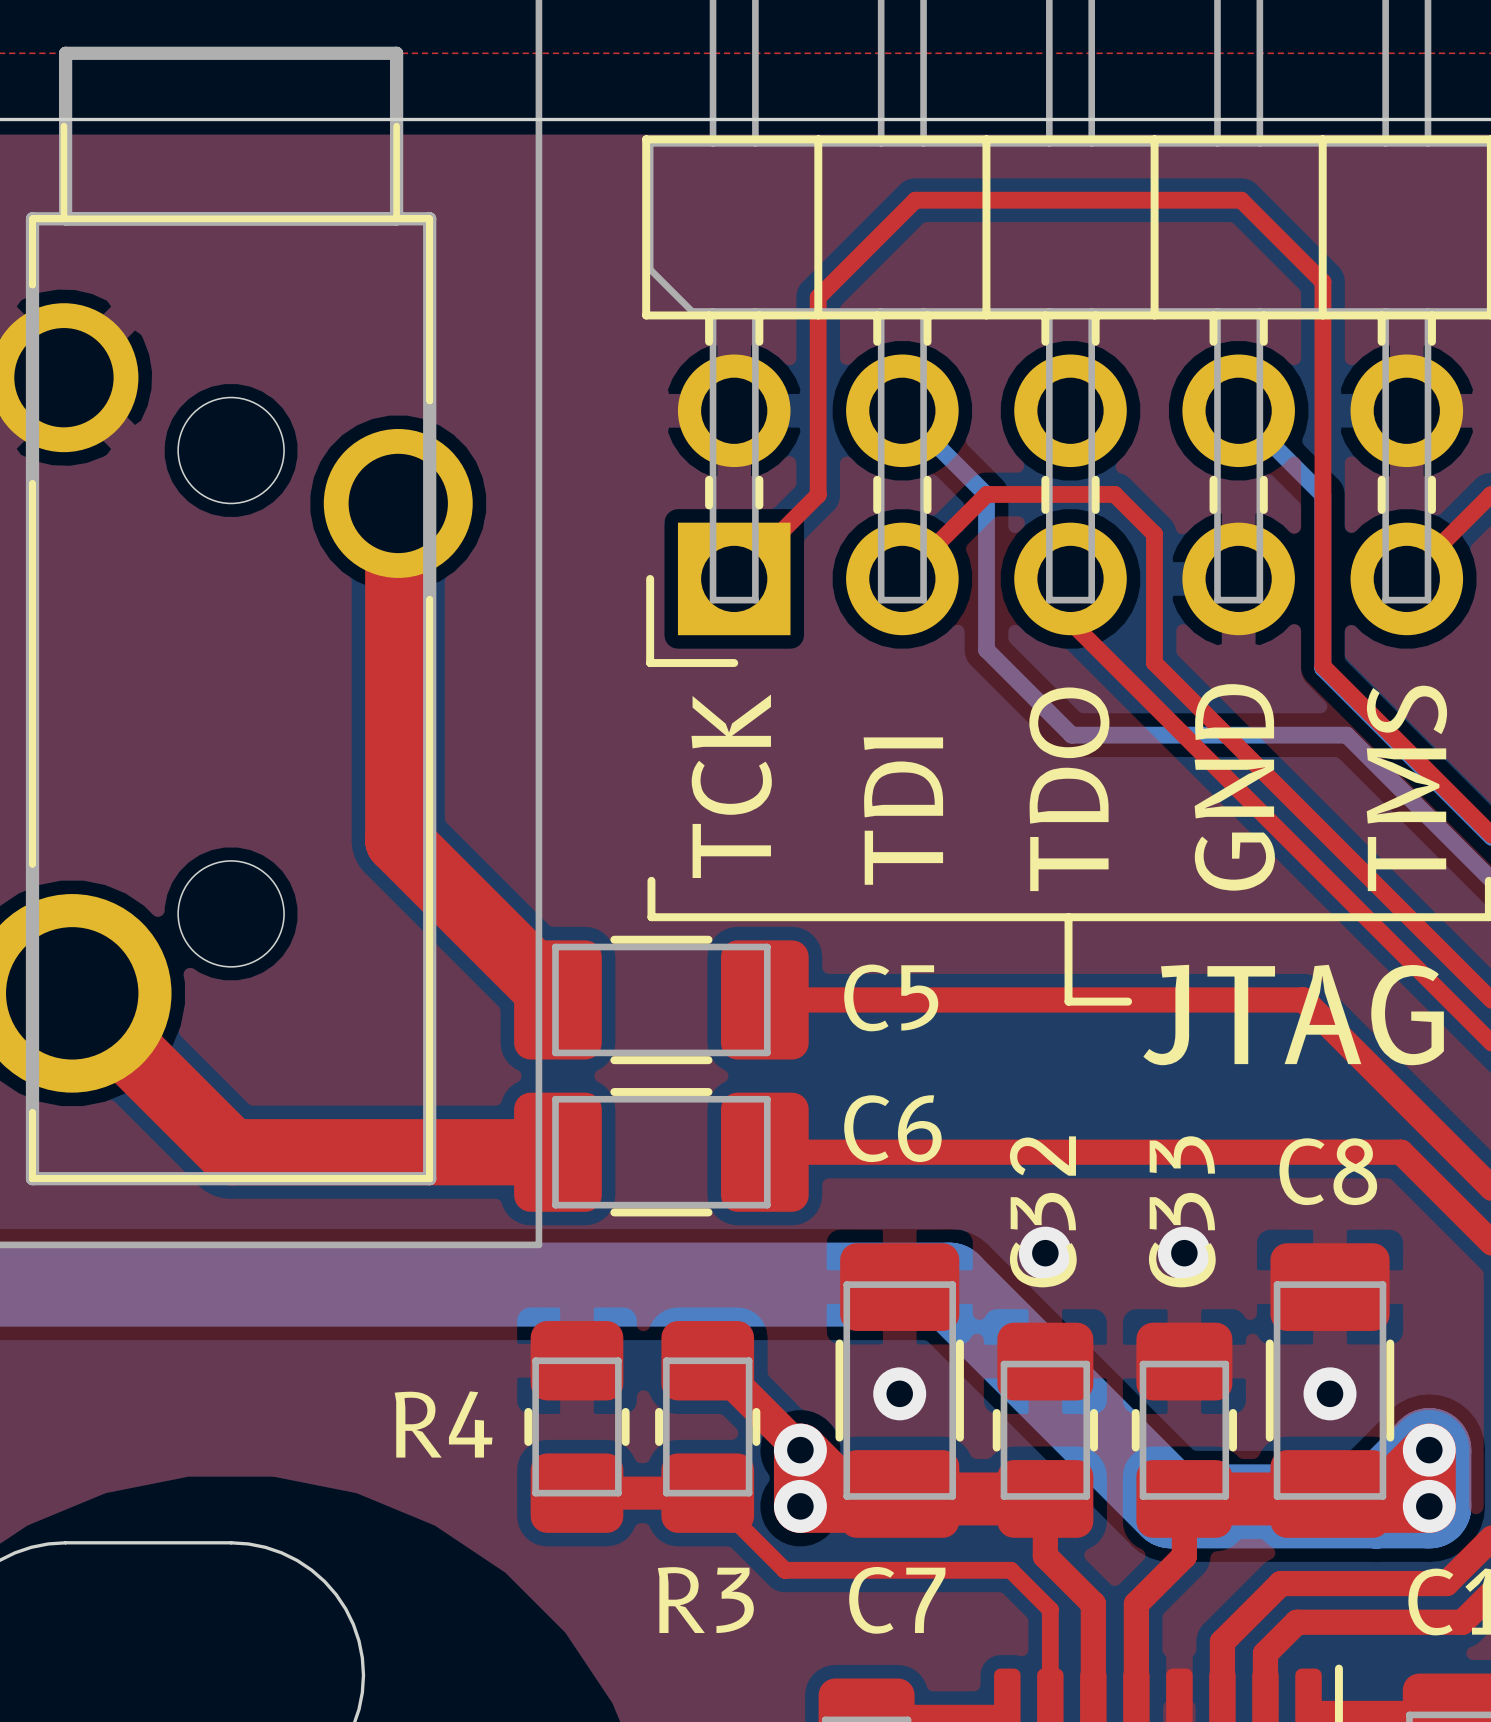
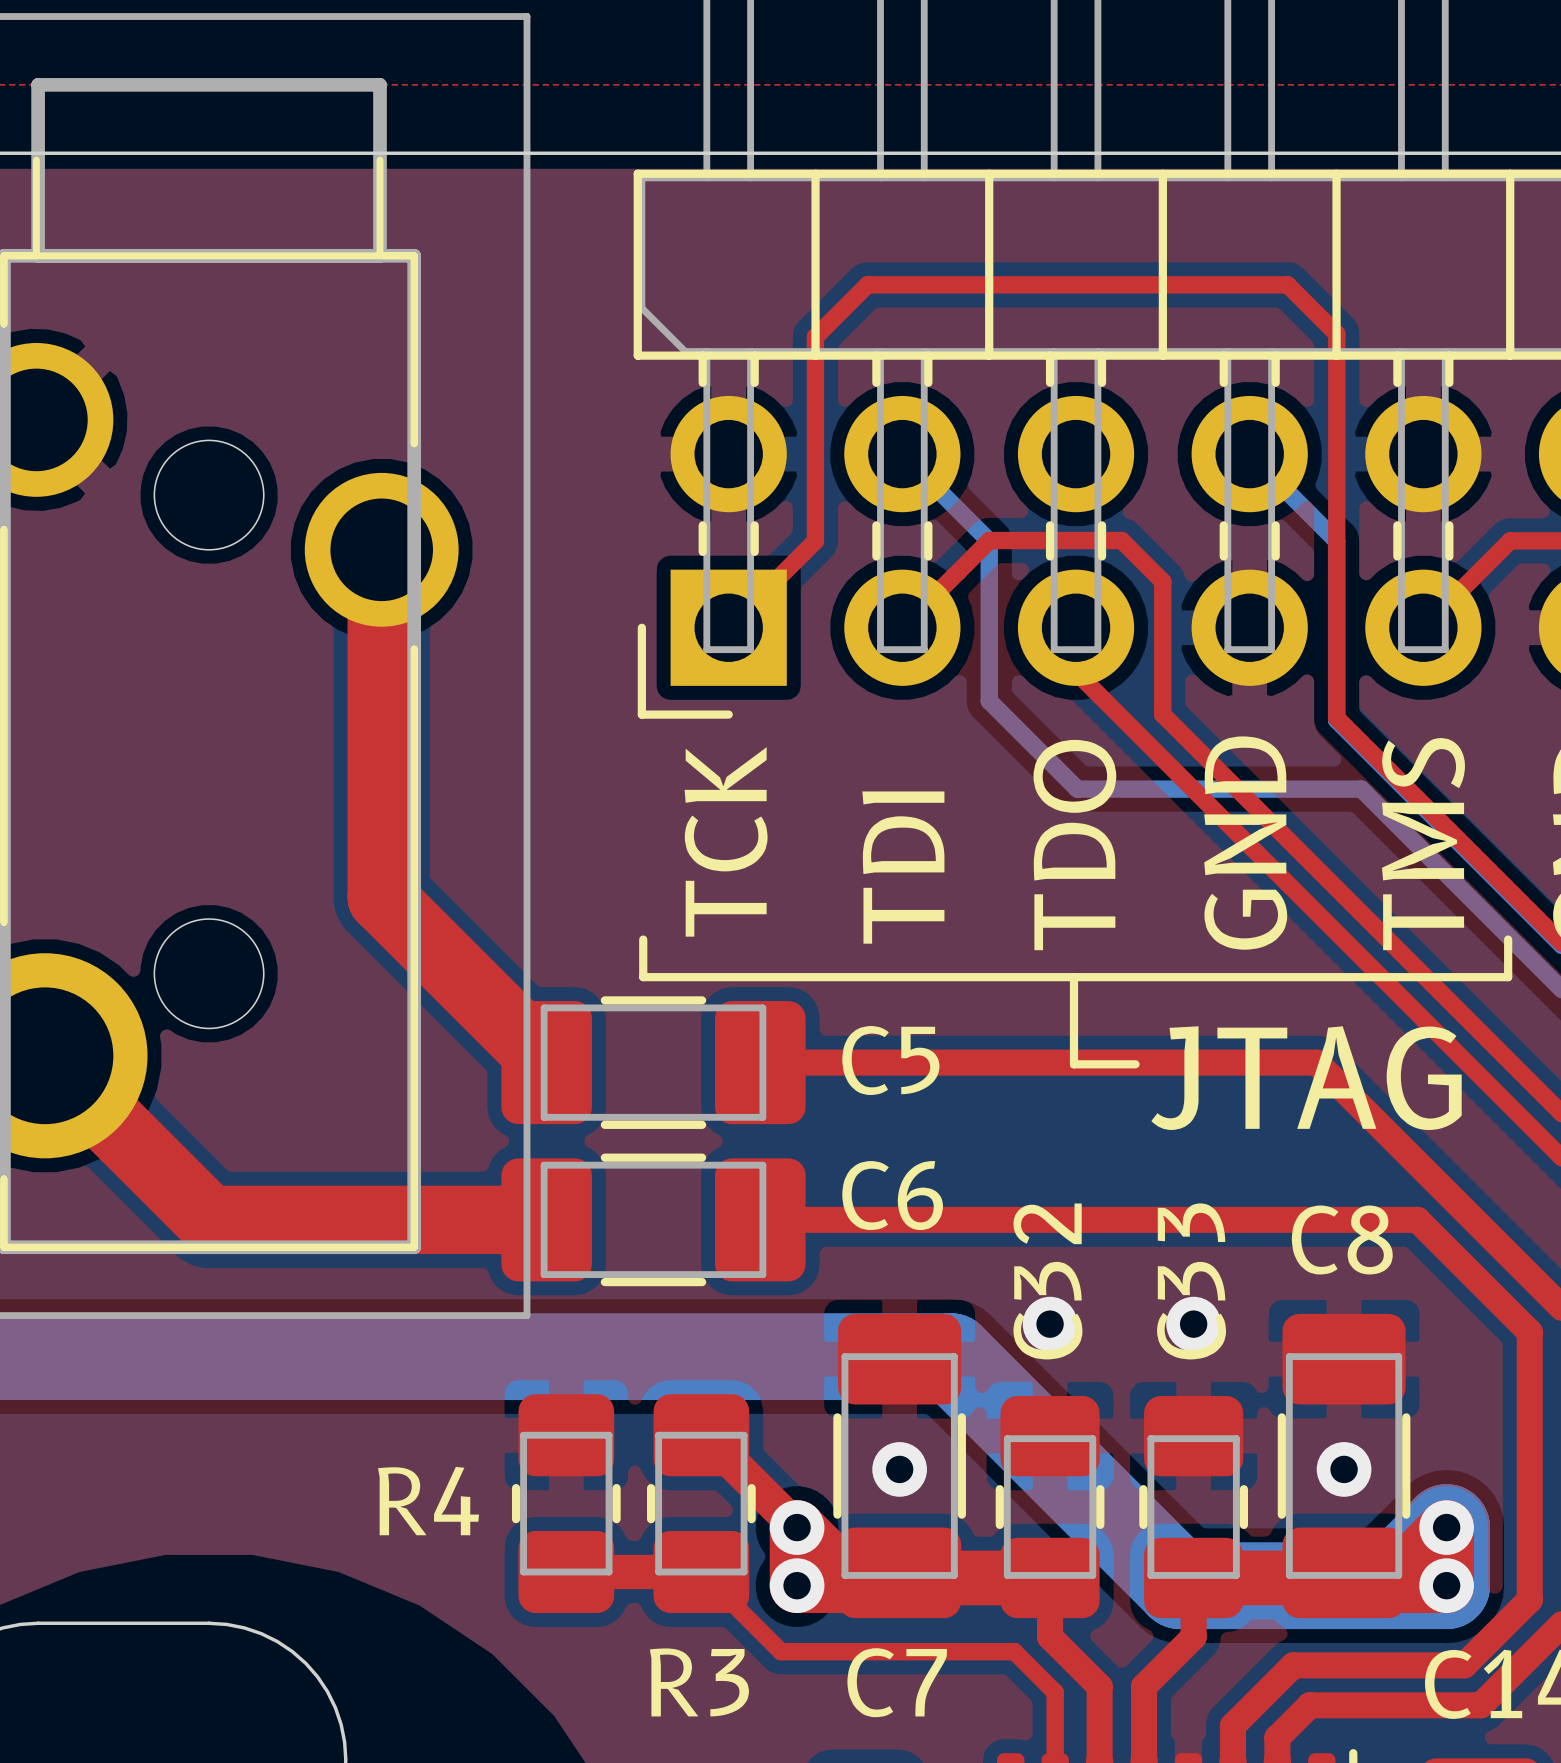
top track: (868, 246) (915, 200) (1241, 200) (1322, 281) (1322, 294) -> (867, 284) (1287, 284) (1336, 333)

